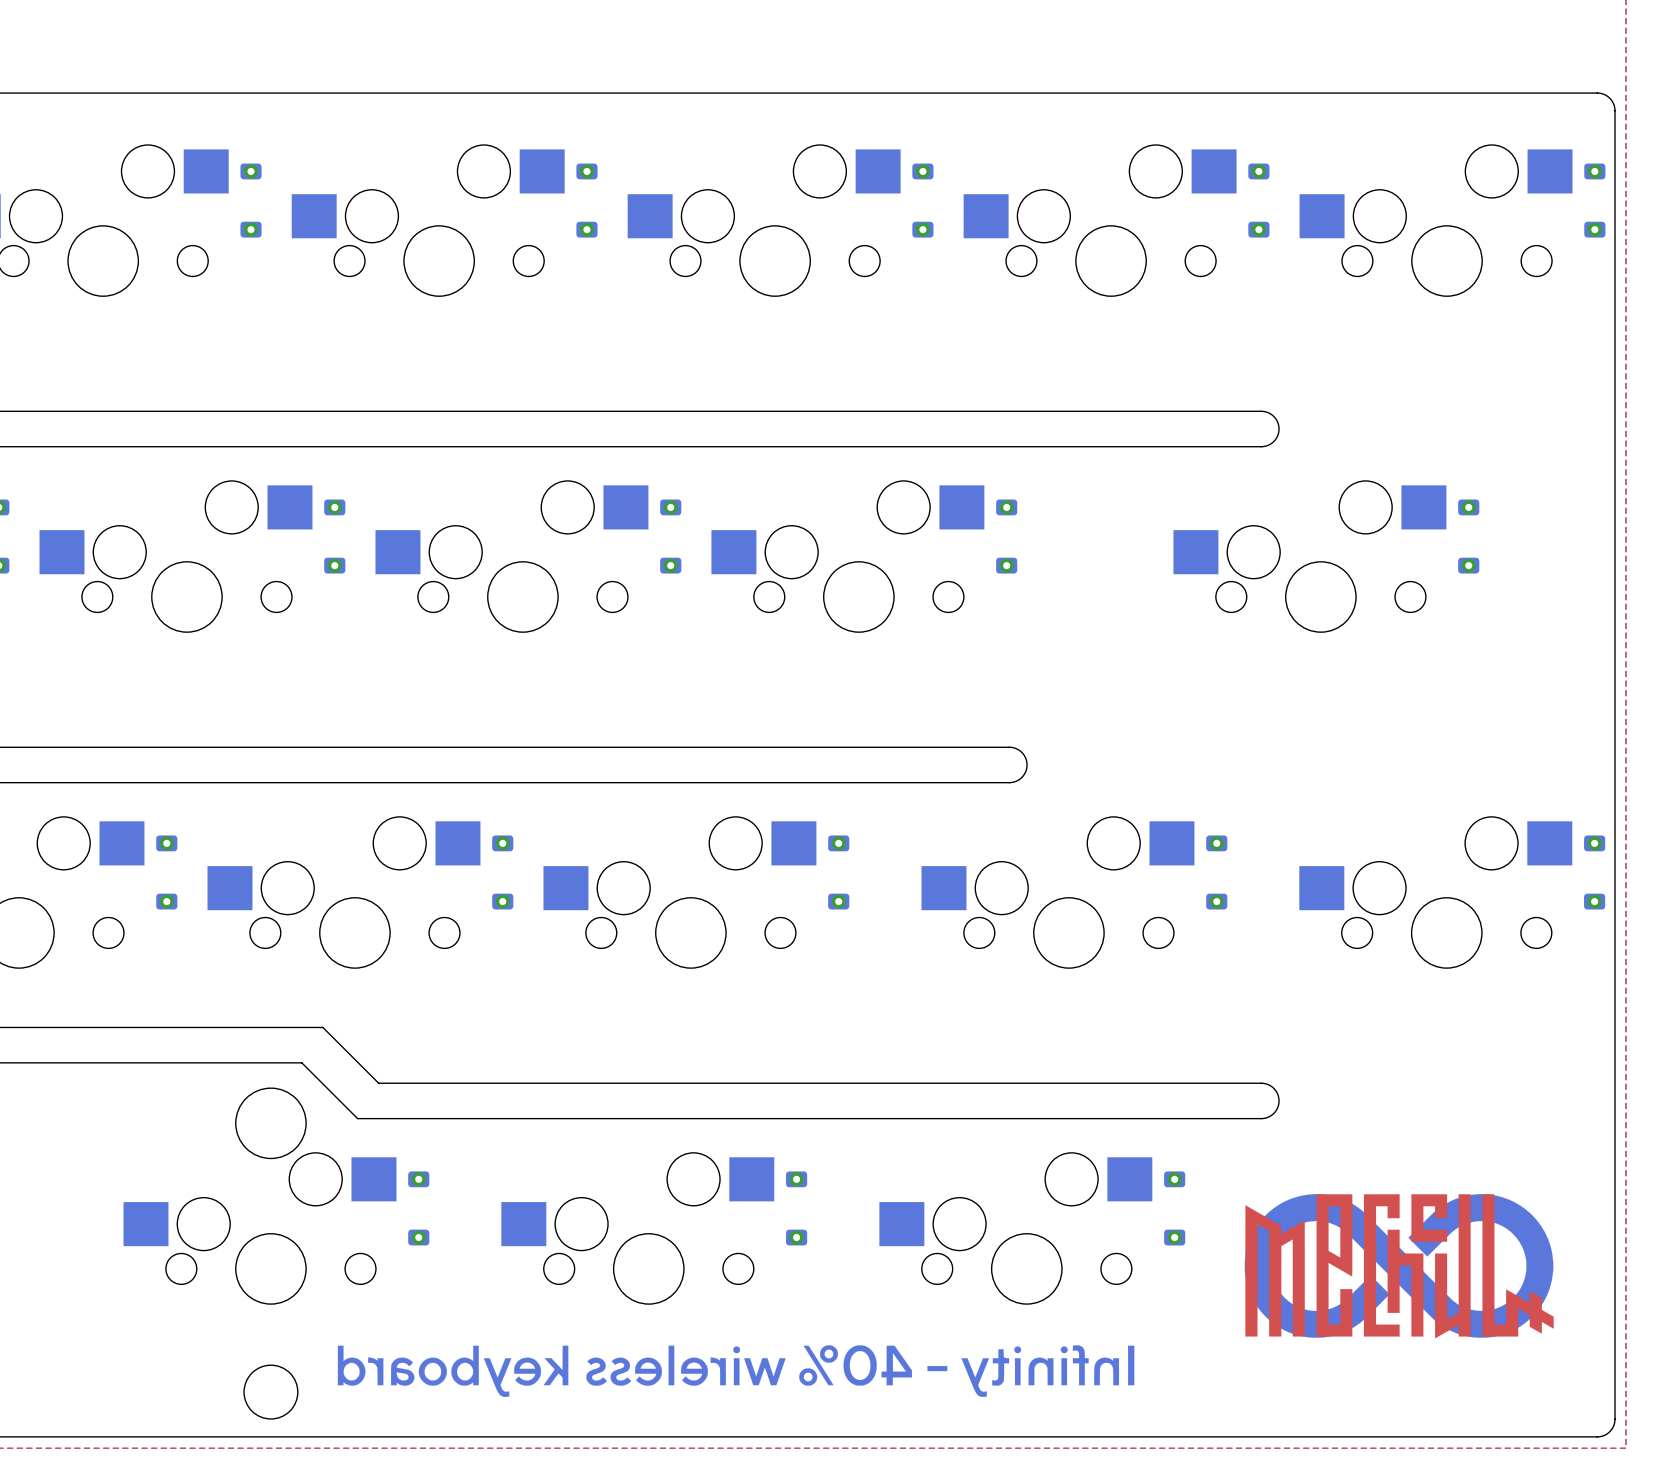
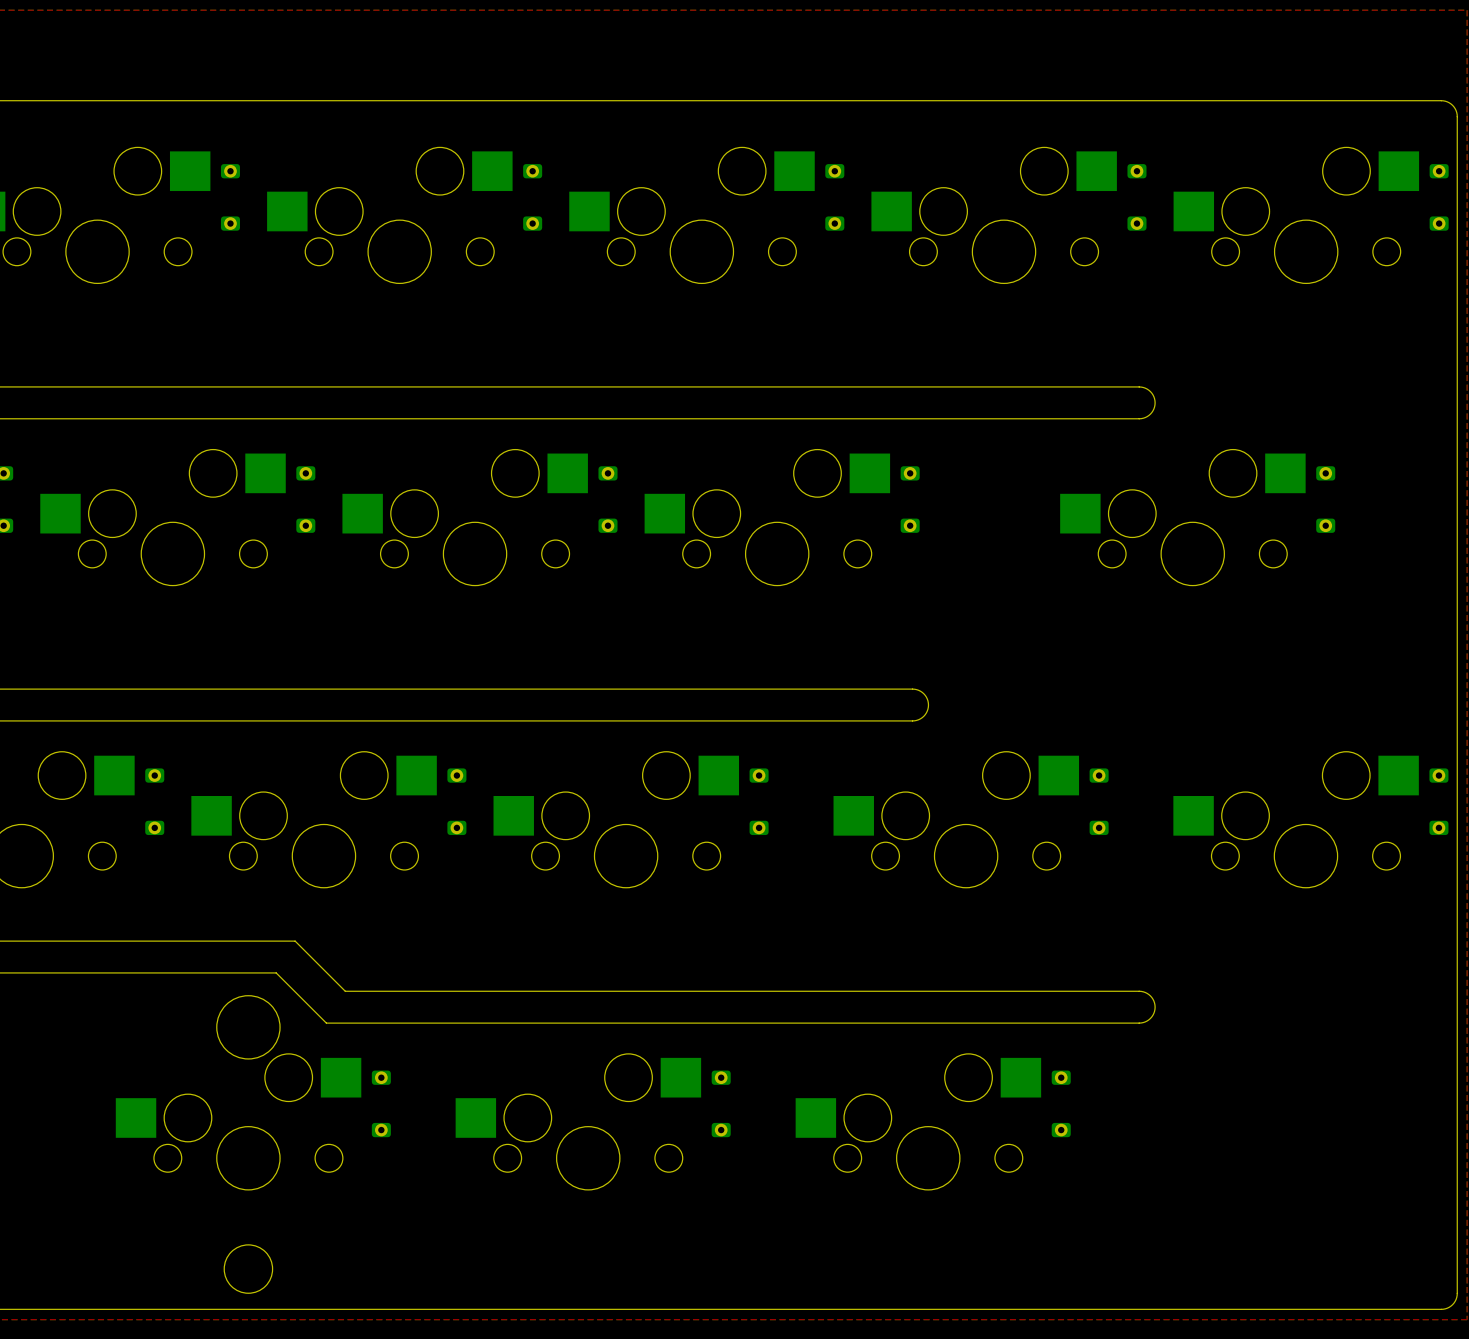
drawing: [1244, 1194, 1554, 1339] -> none
drawing: [337, 1345, 1135, 1397] -> none

